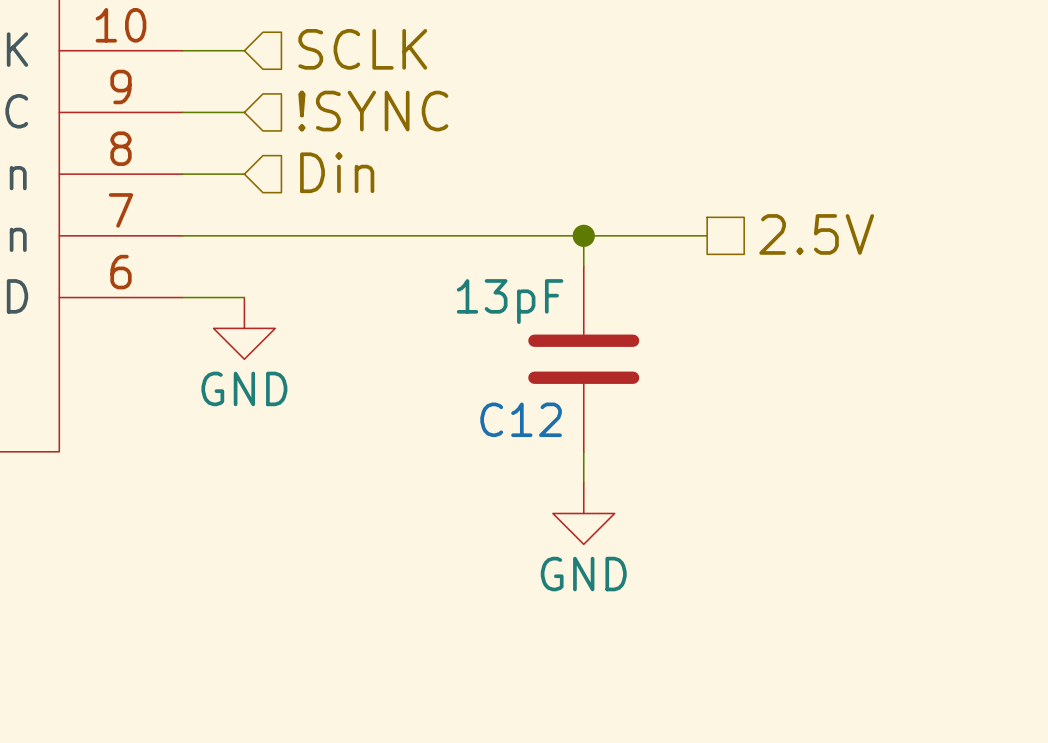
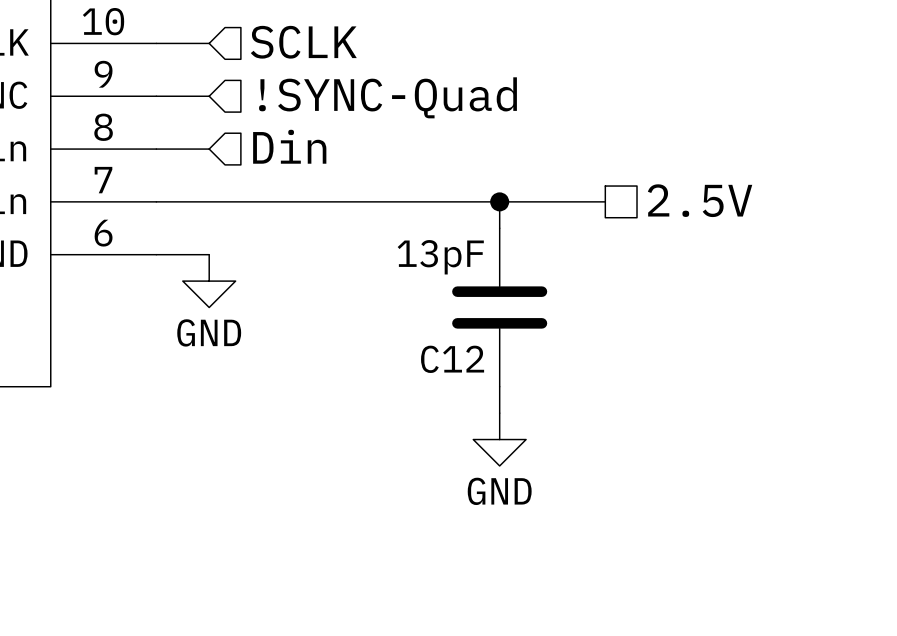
hierarchical label: !SYNC (373, 111) -> !SYNC-Quad (387, 97)

